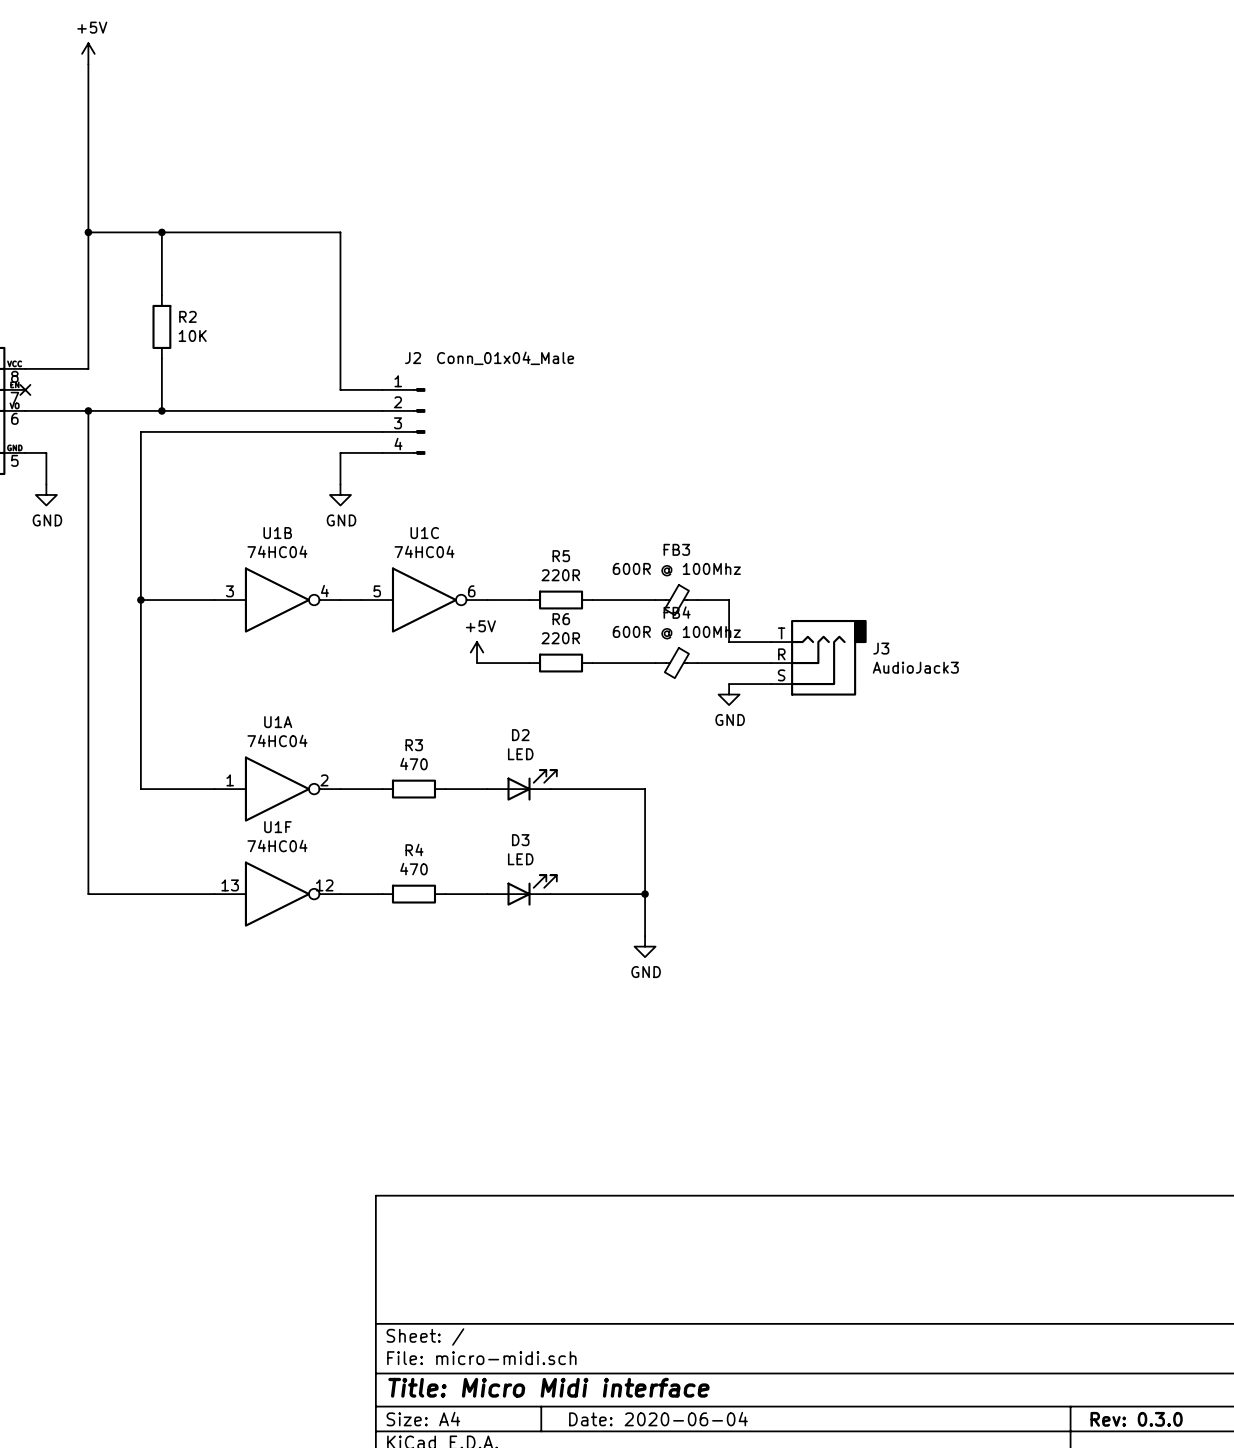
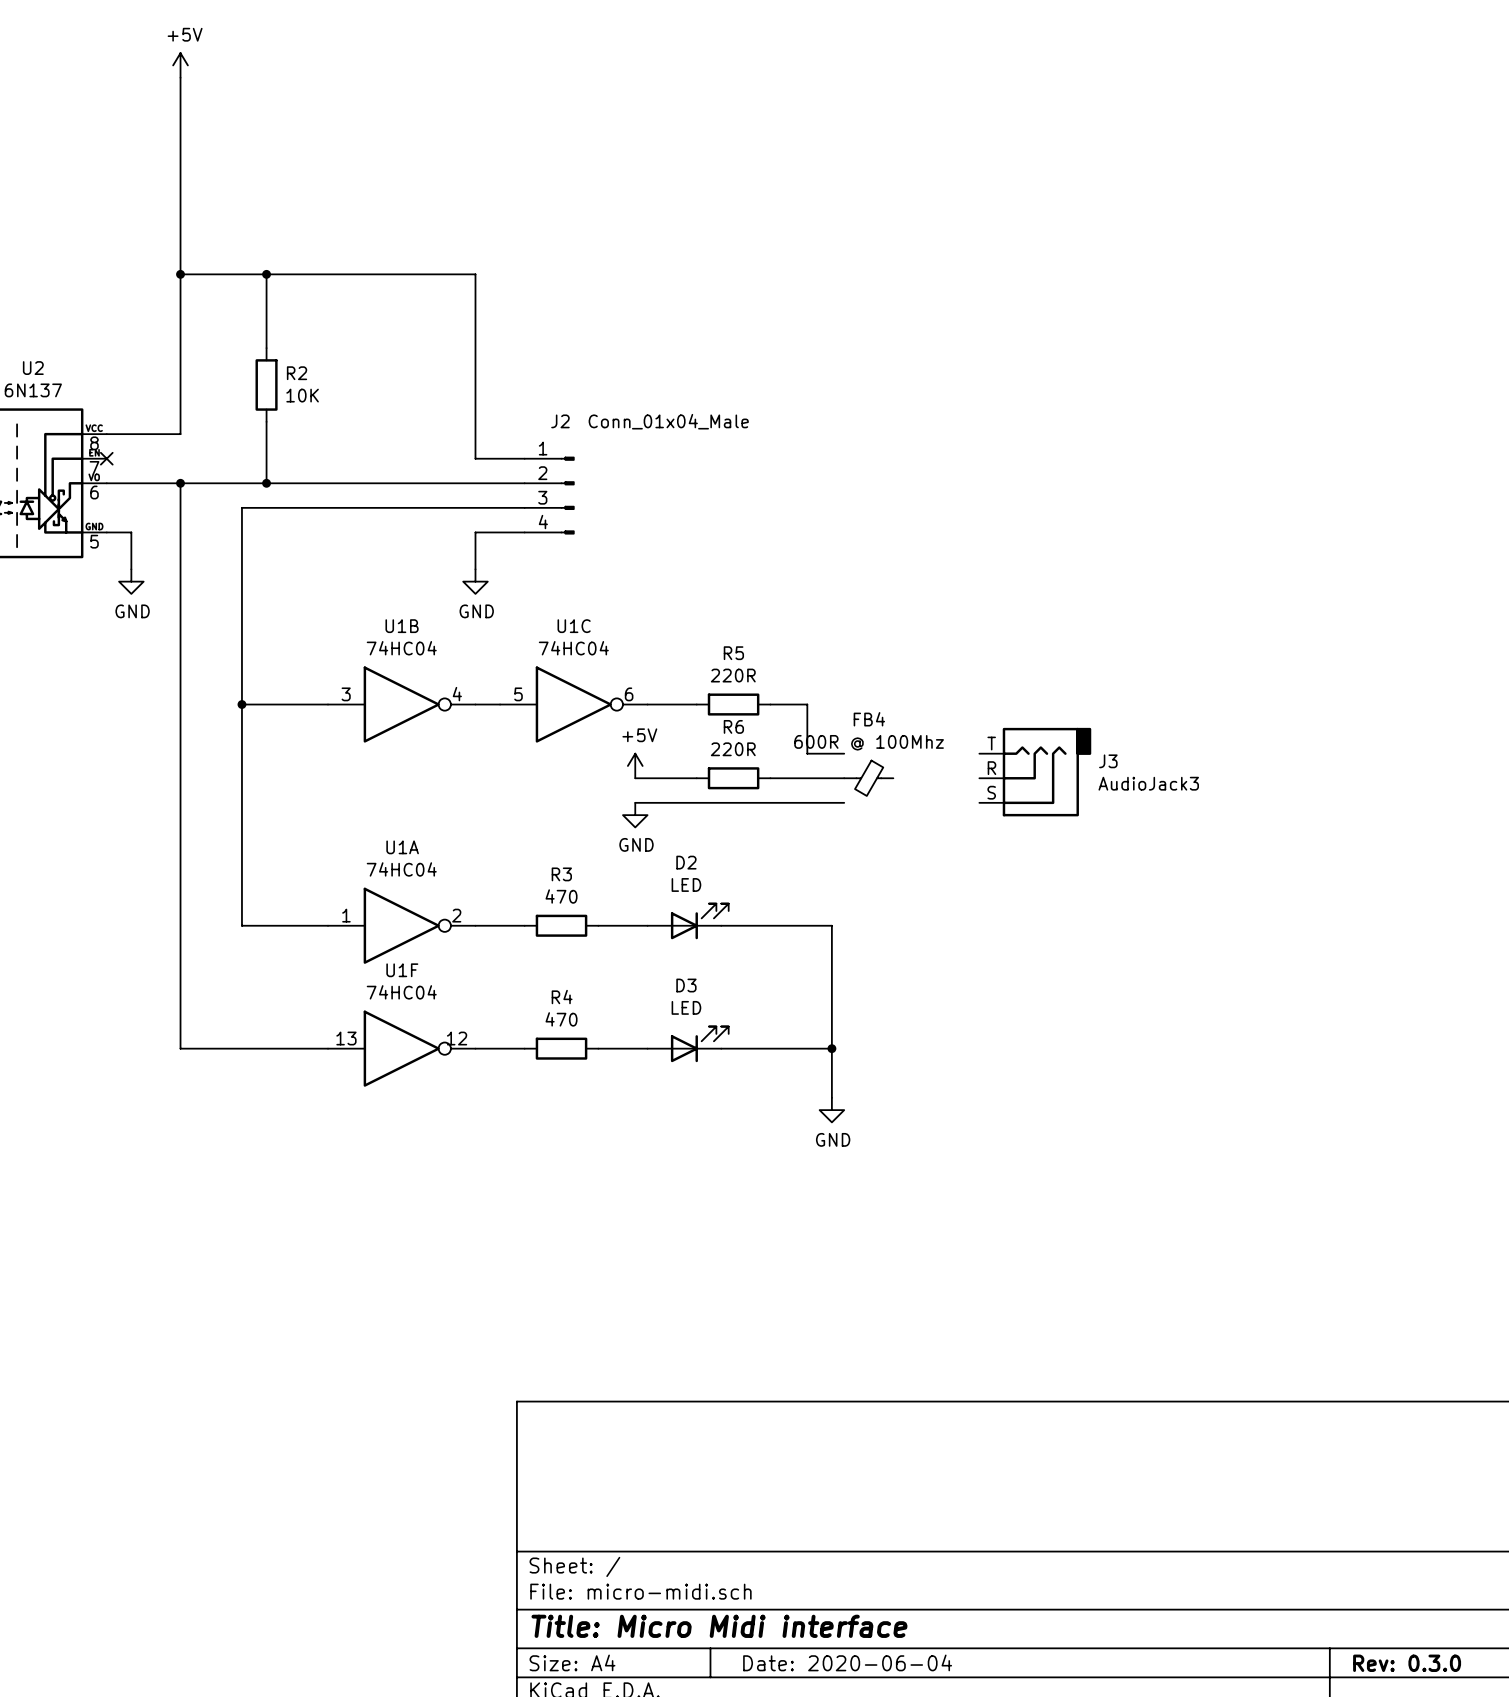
wire: (624, 600) (655, 600) -> (807, 704) (807, 753) (844, 753)
FB3: 600R @ 100Mhz (676, 600) -> none
wire: (697, 600) (729, 600) (729, 642) (771, 642) -> none
wire: (697, 663) (771, 663) -> none
wire: none -> (635, 802) (844, 802)
wire: (729, 684) (771, 684) -> none
power symbol: none -> GND (635, 815)
power symbol: GND (729, 694) -> none

